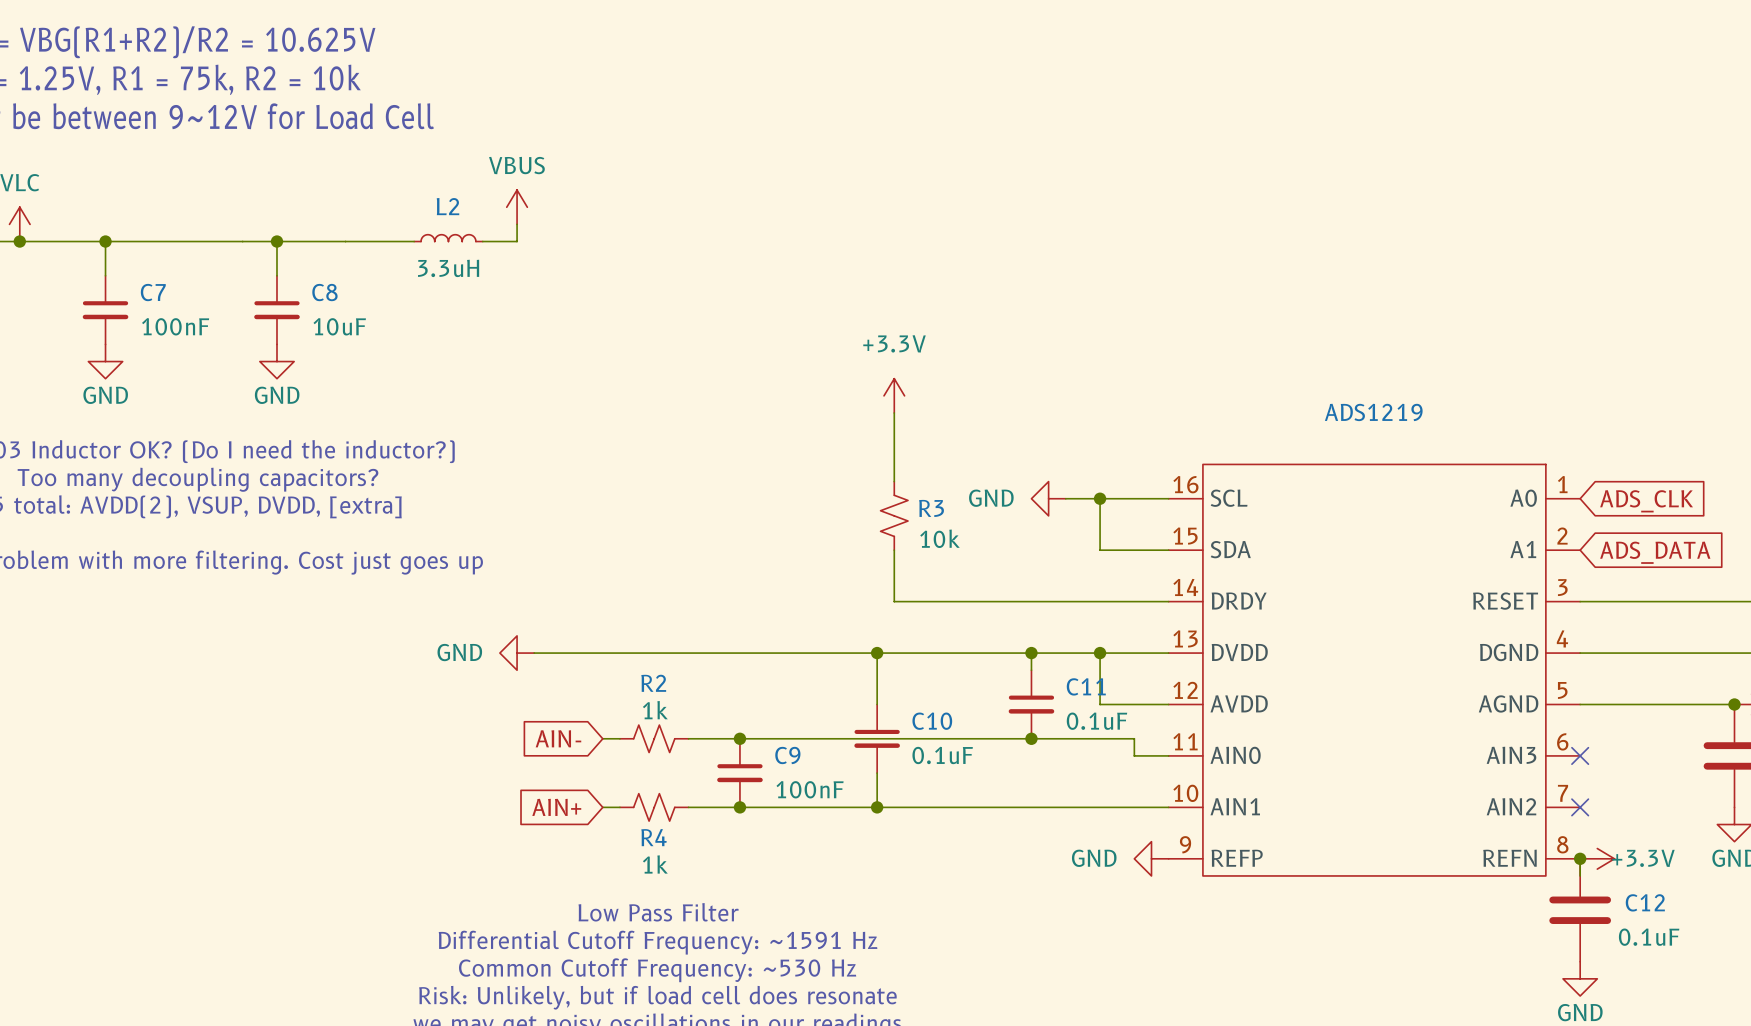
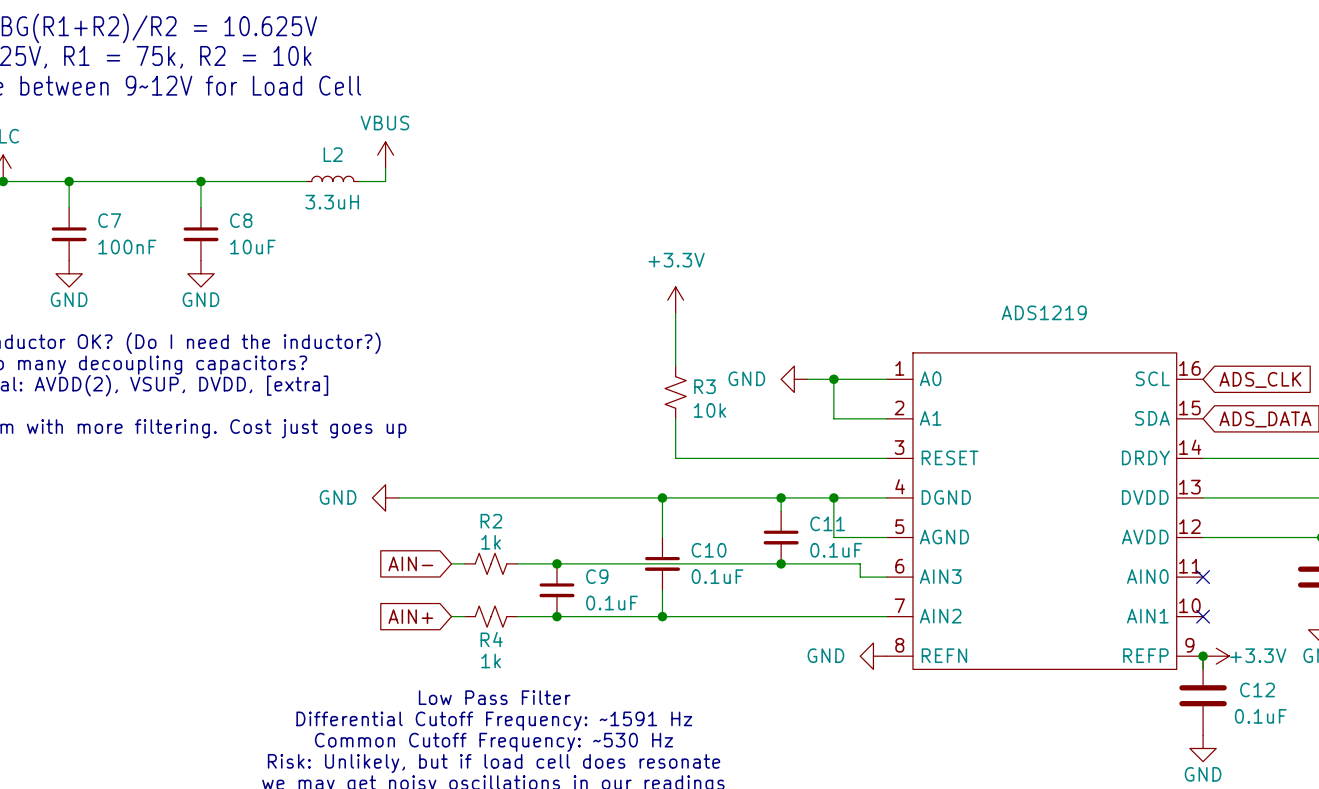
ADS1219 flip: as is (1374, 670) -> left-right (1044, 511)
C9 value: 100nF (810, 789) -> 0.1uF (612, 603)

